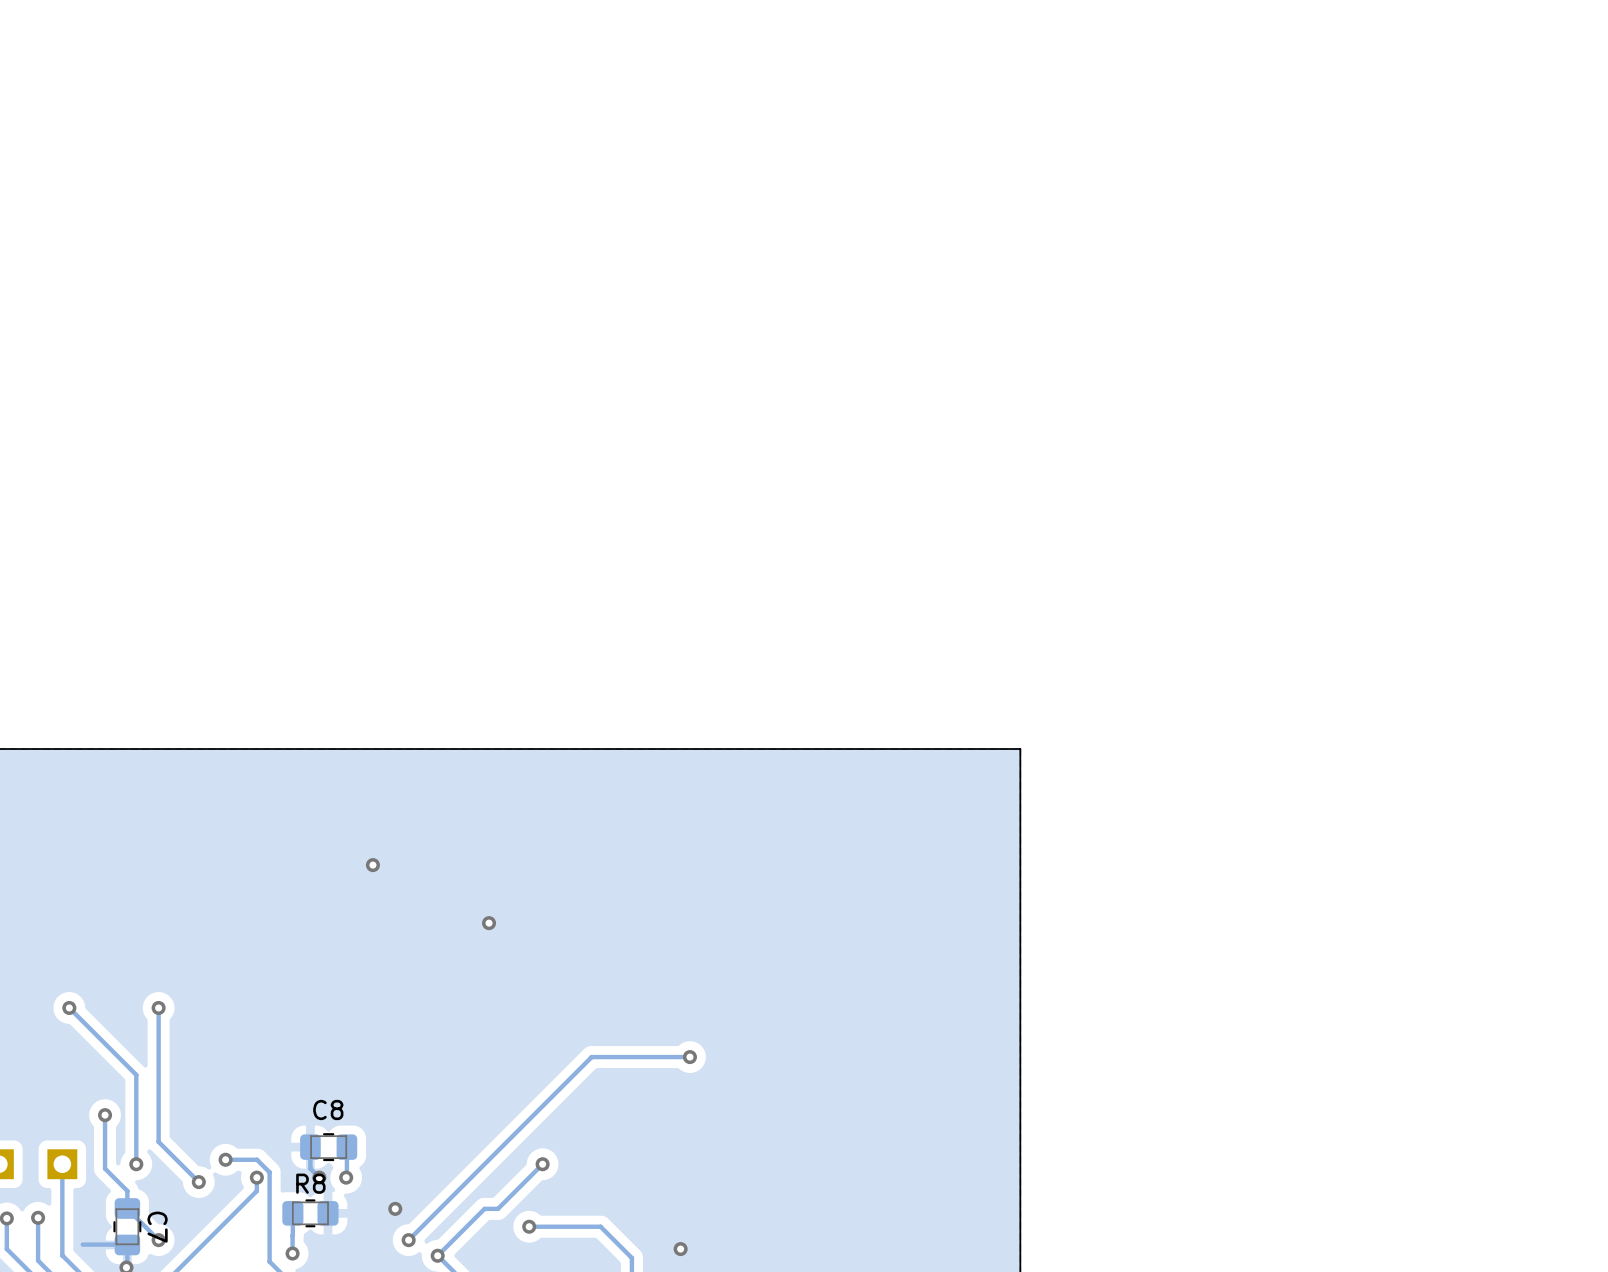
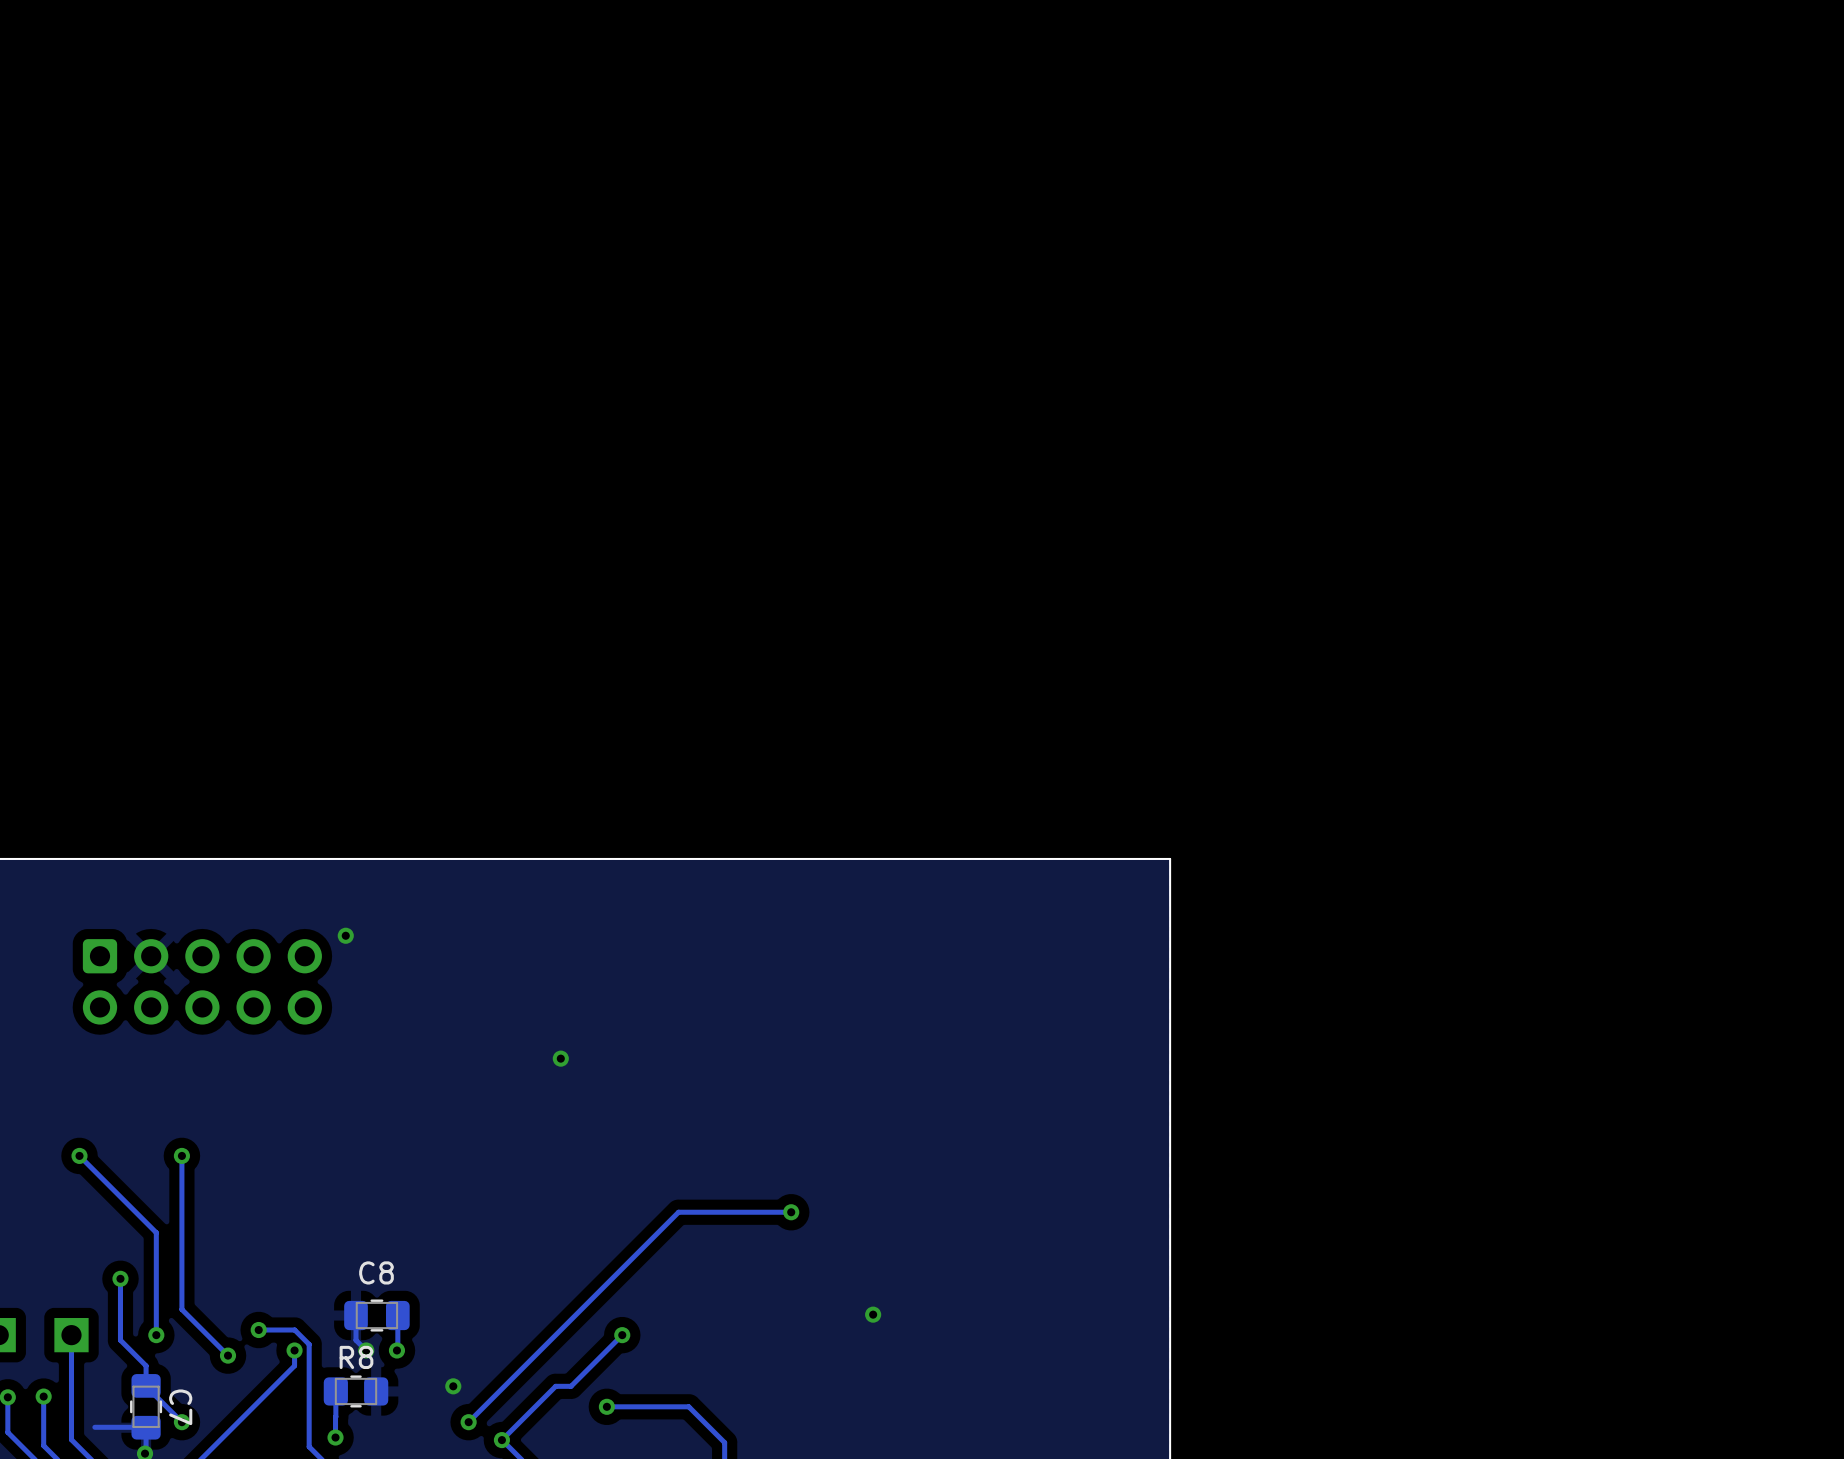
part: none -> (202, 981)
via position: (372, 865) -> (345, 935)
via: none -> (873, 1314)
via: (680, 1249) -> none

